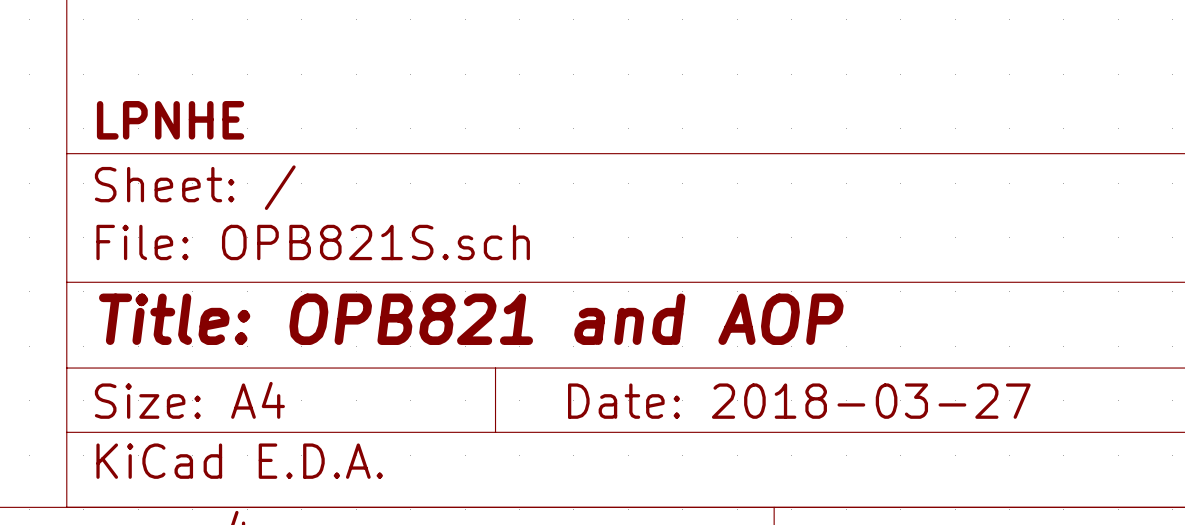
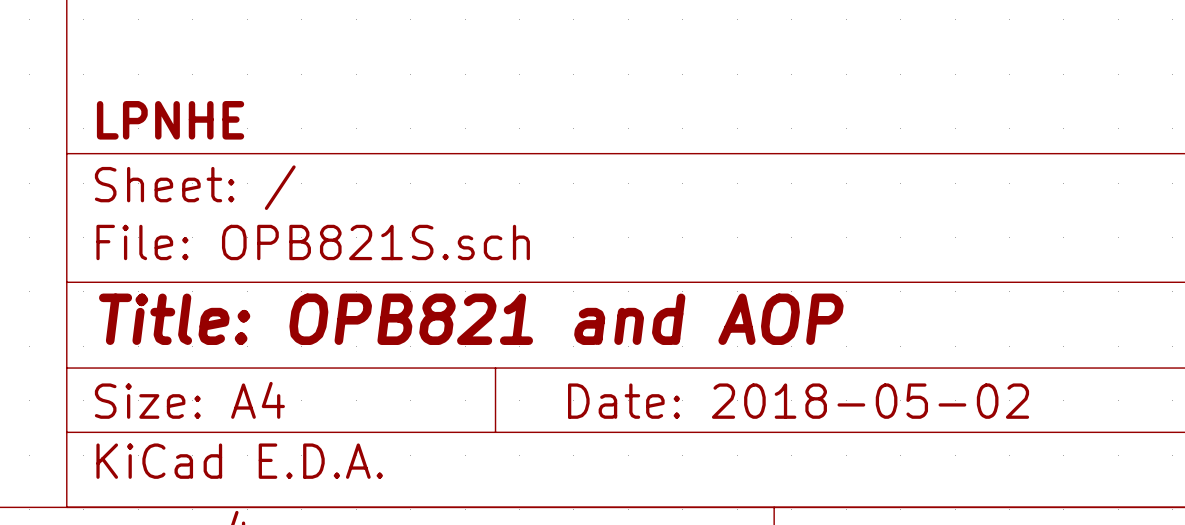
title block: Date: 2018-03-27 (799, 401) -> Date: 2018-05-02 (798, 401)

